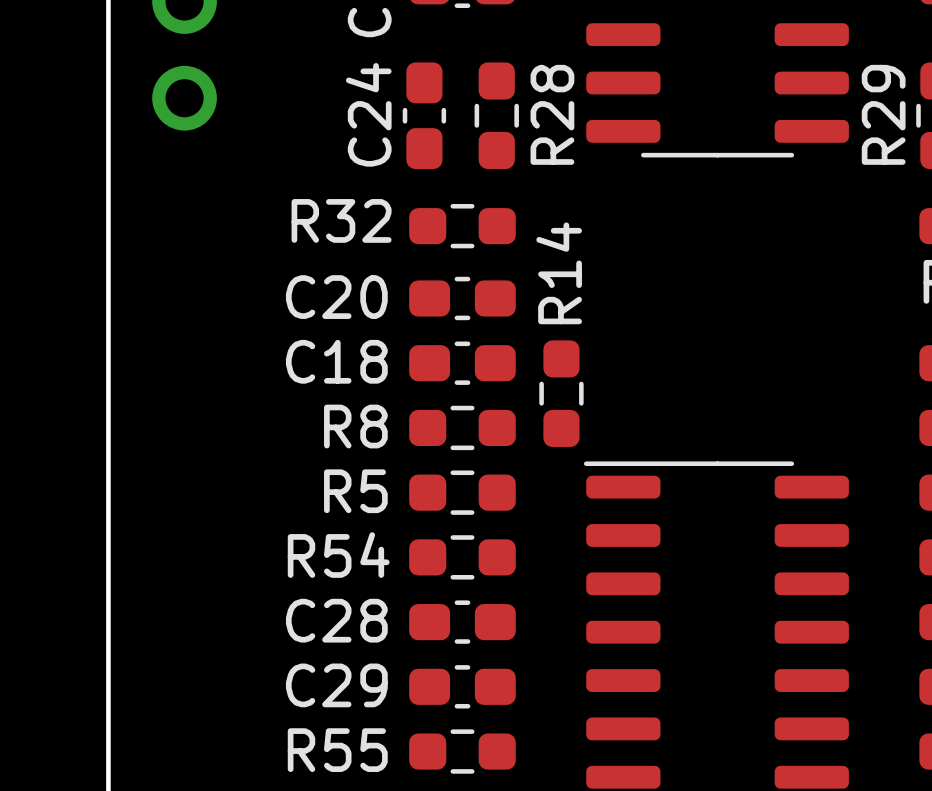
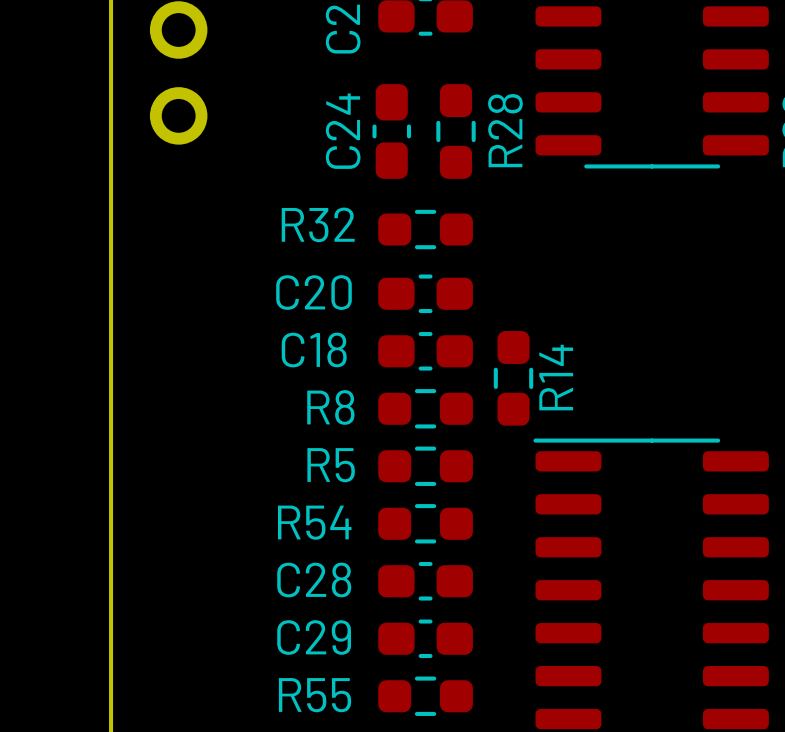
R14 name position: R14 (559, 273) -> R14 (556, 377)

